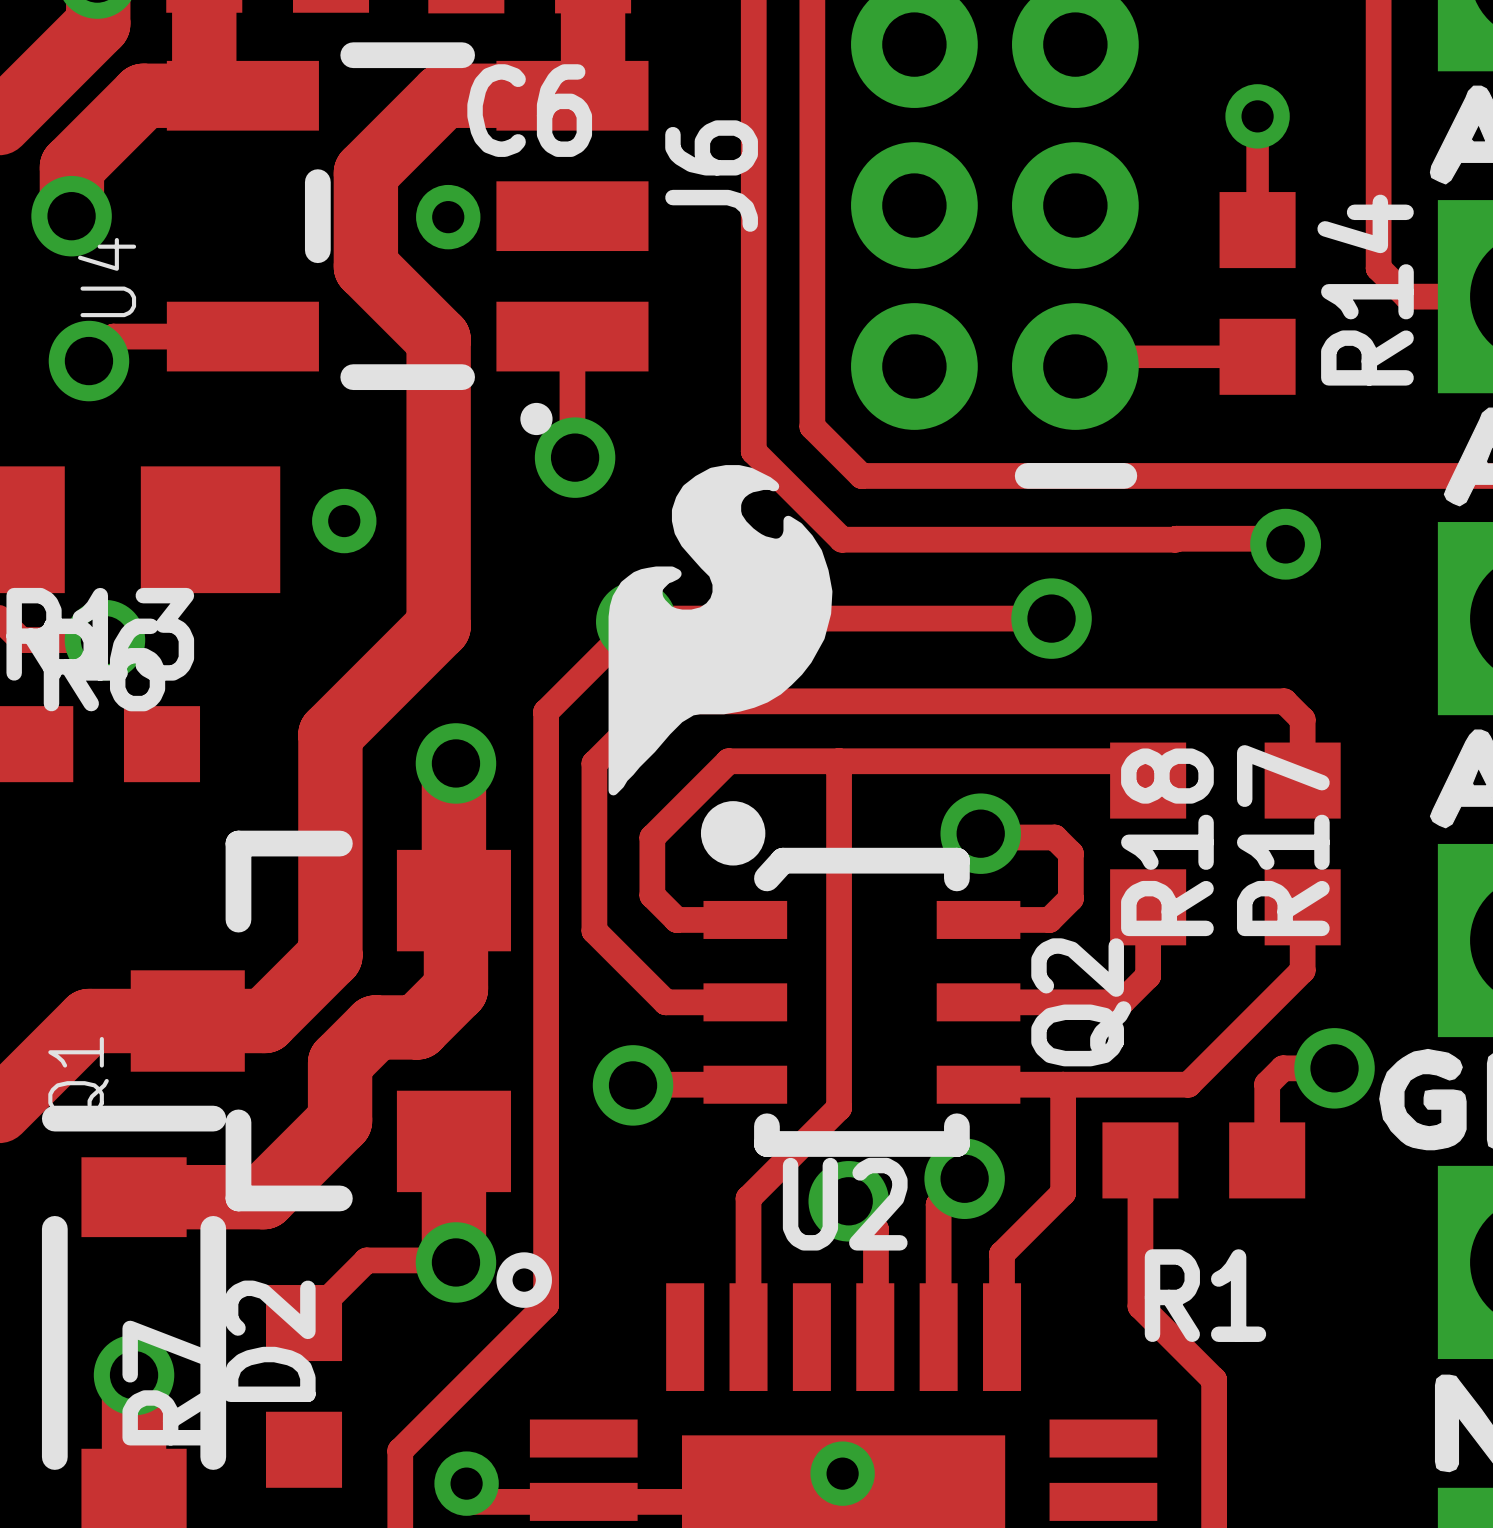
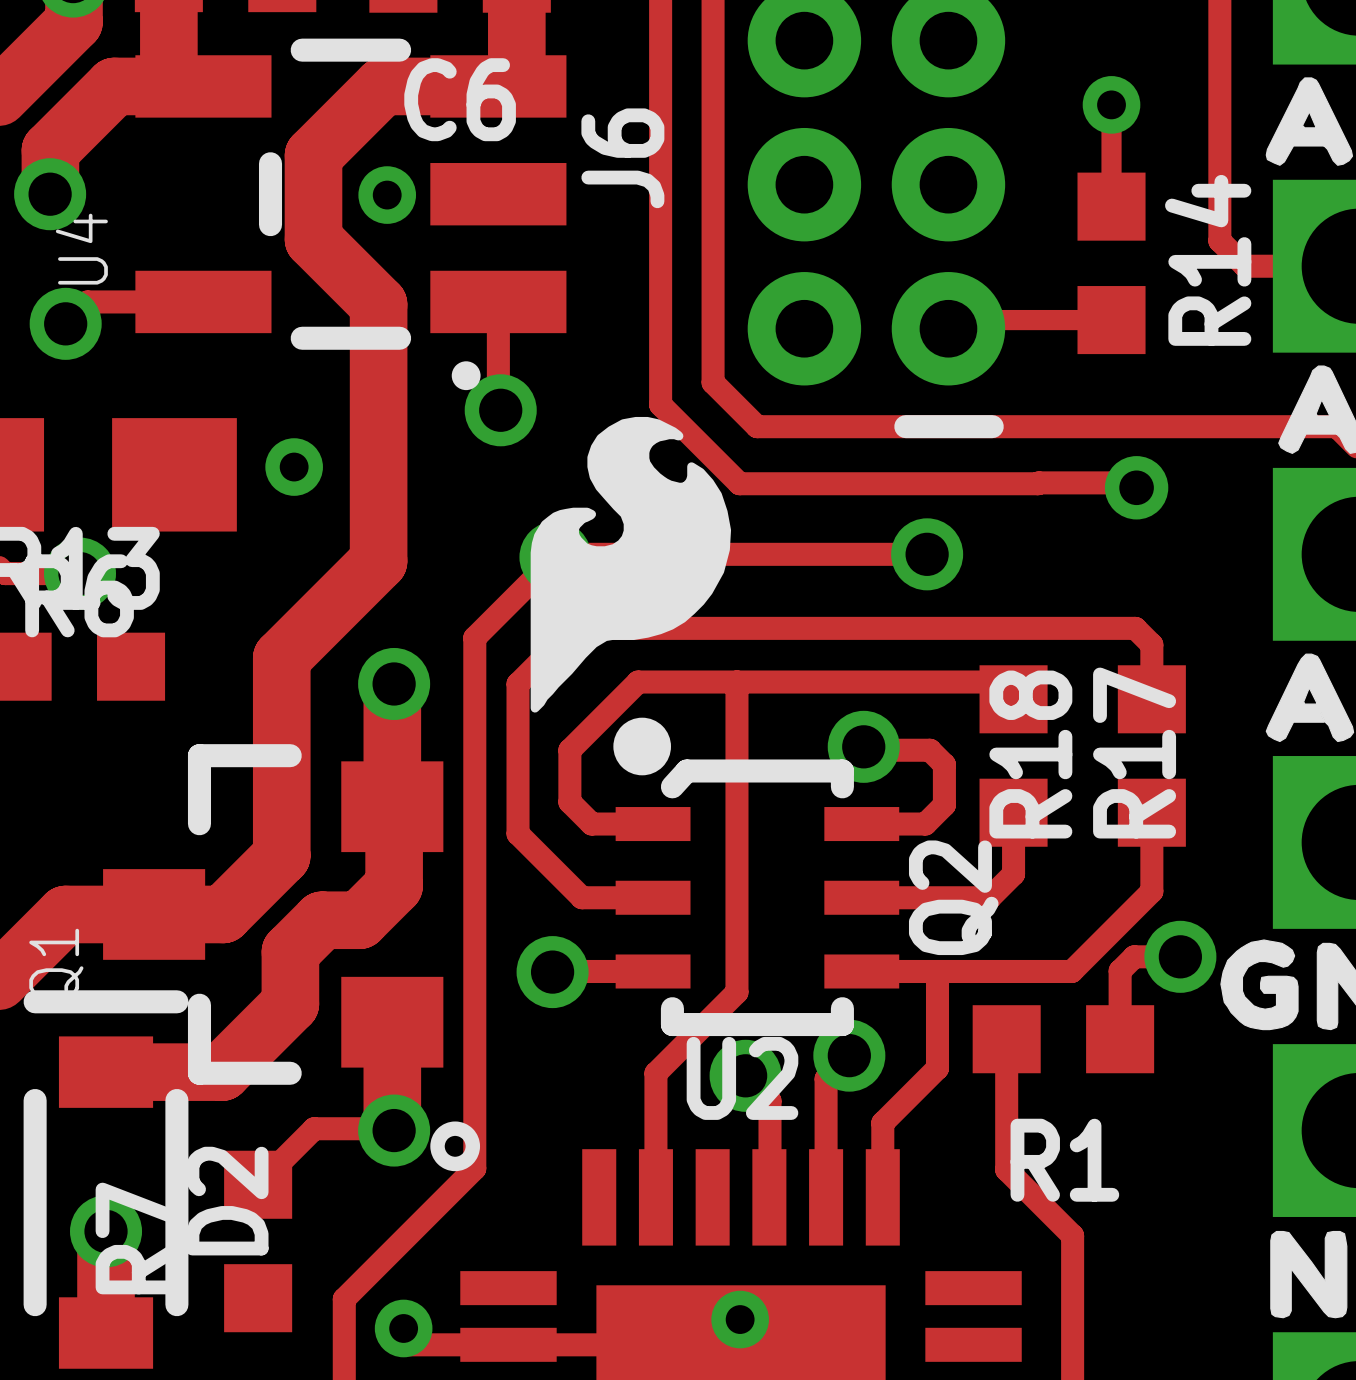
track: (1302, 970) (1188, 1084) -> (1151, 869) (1151, 891) (1071, 971) (1049, 971)

